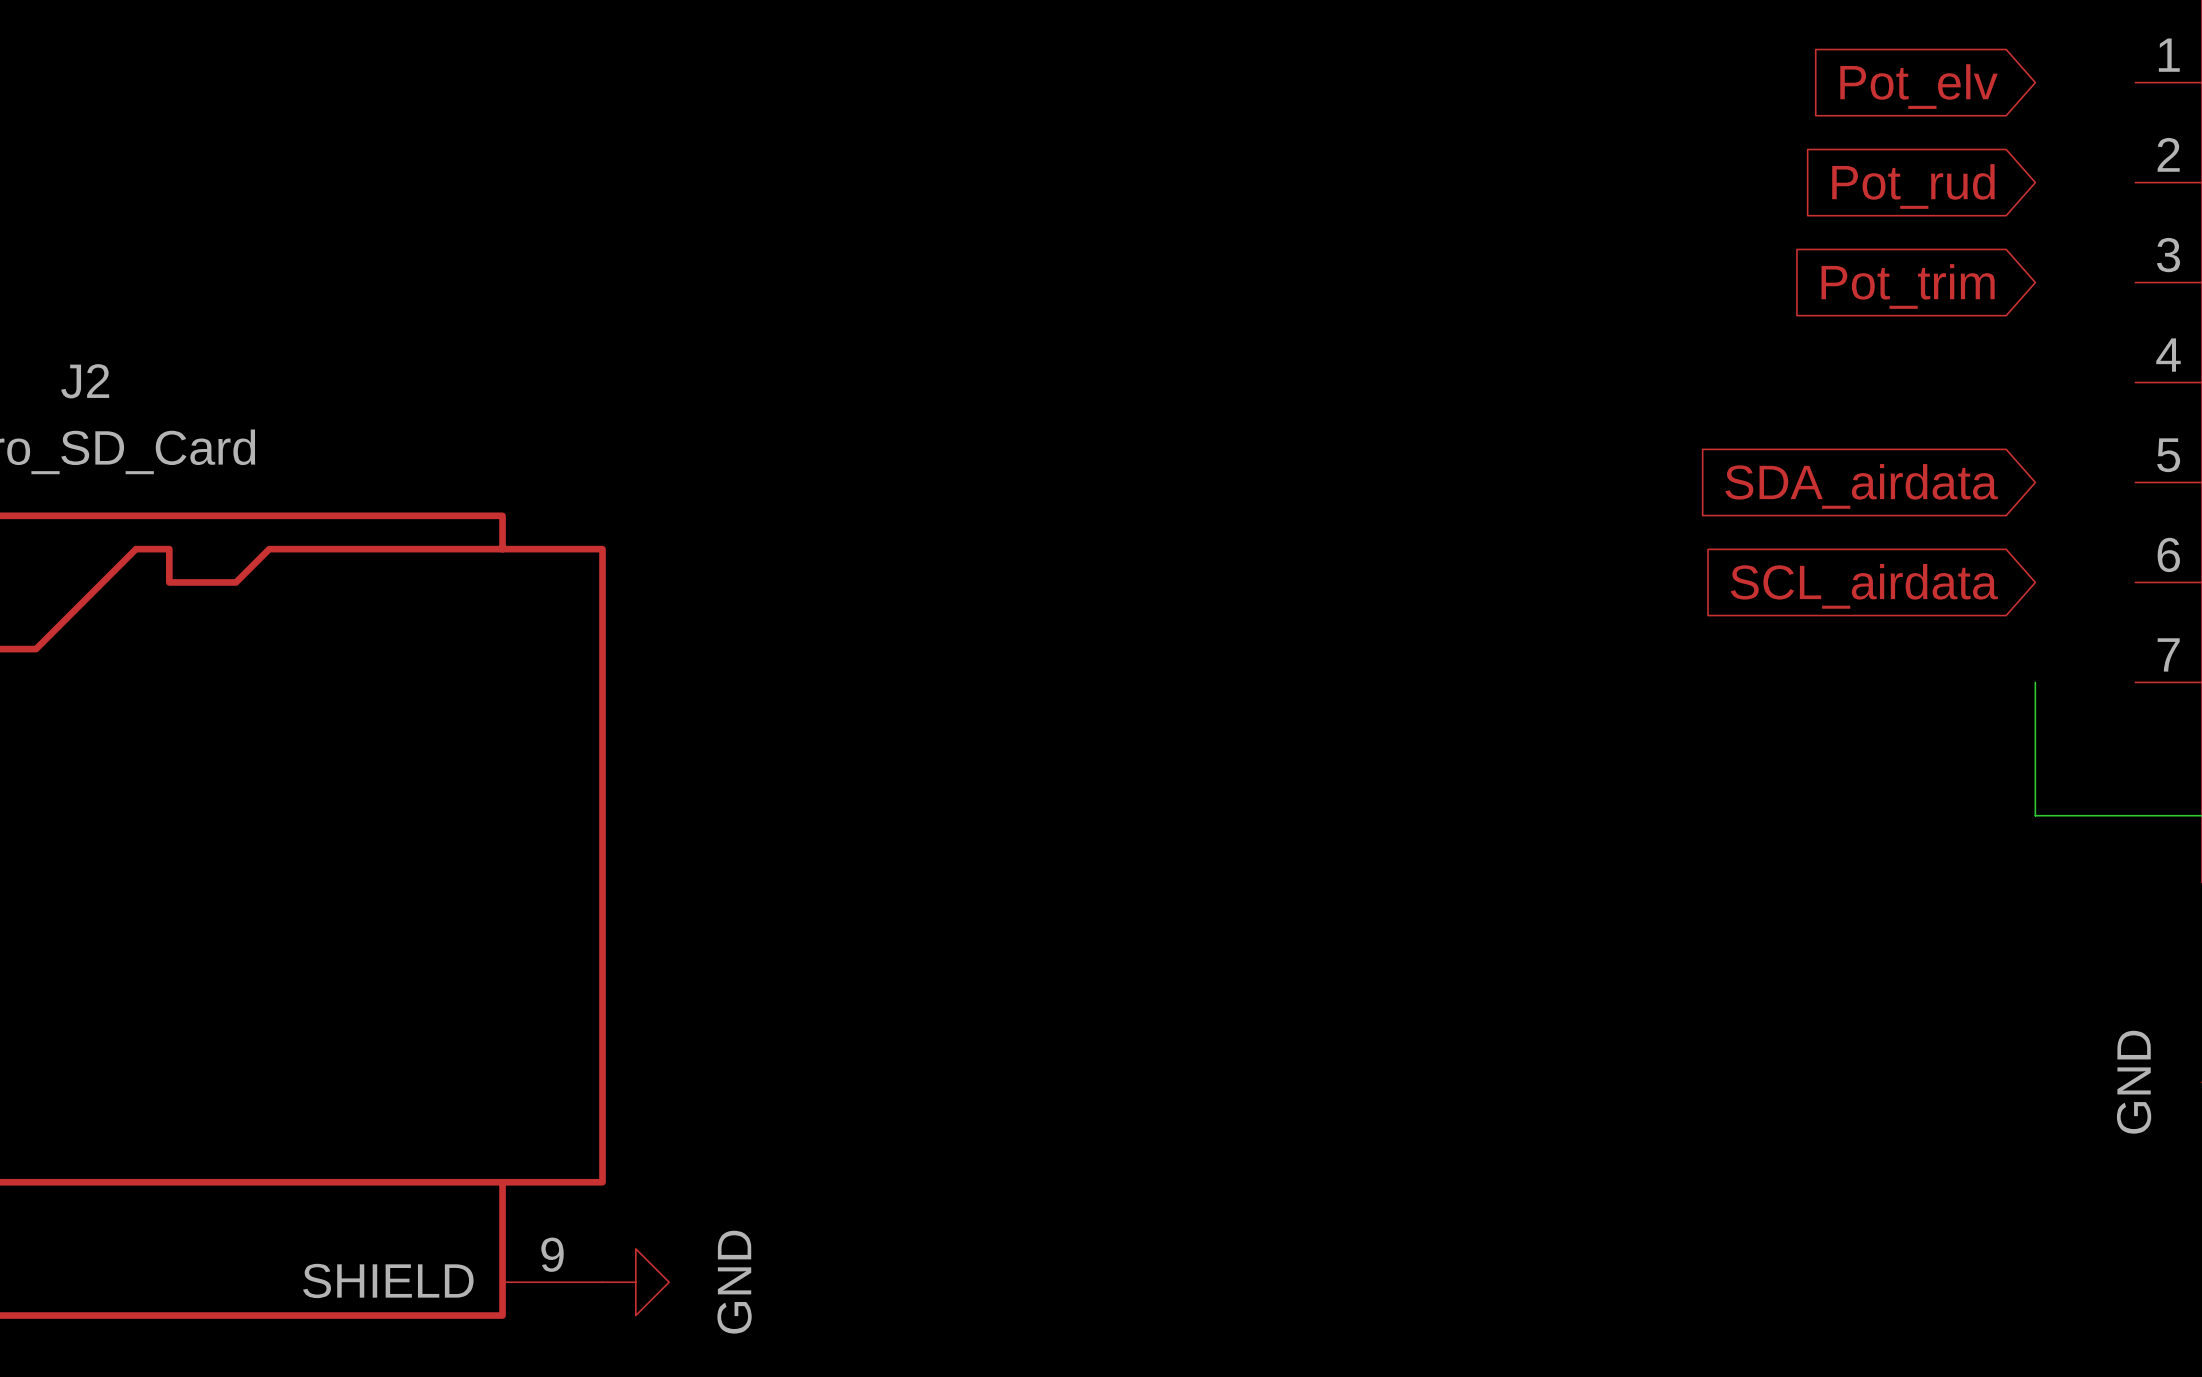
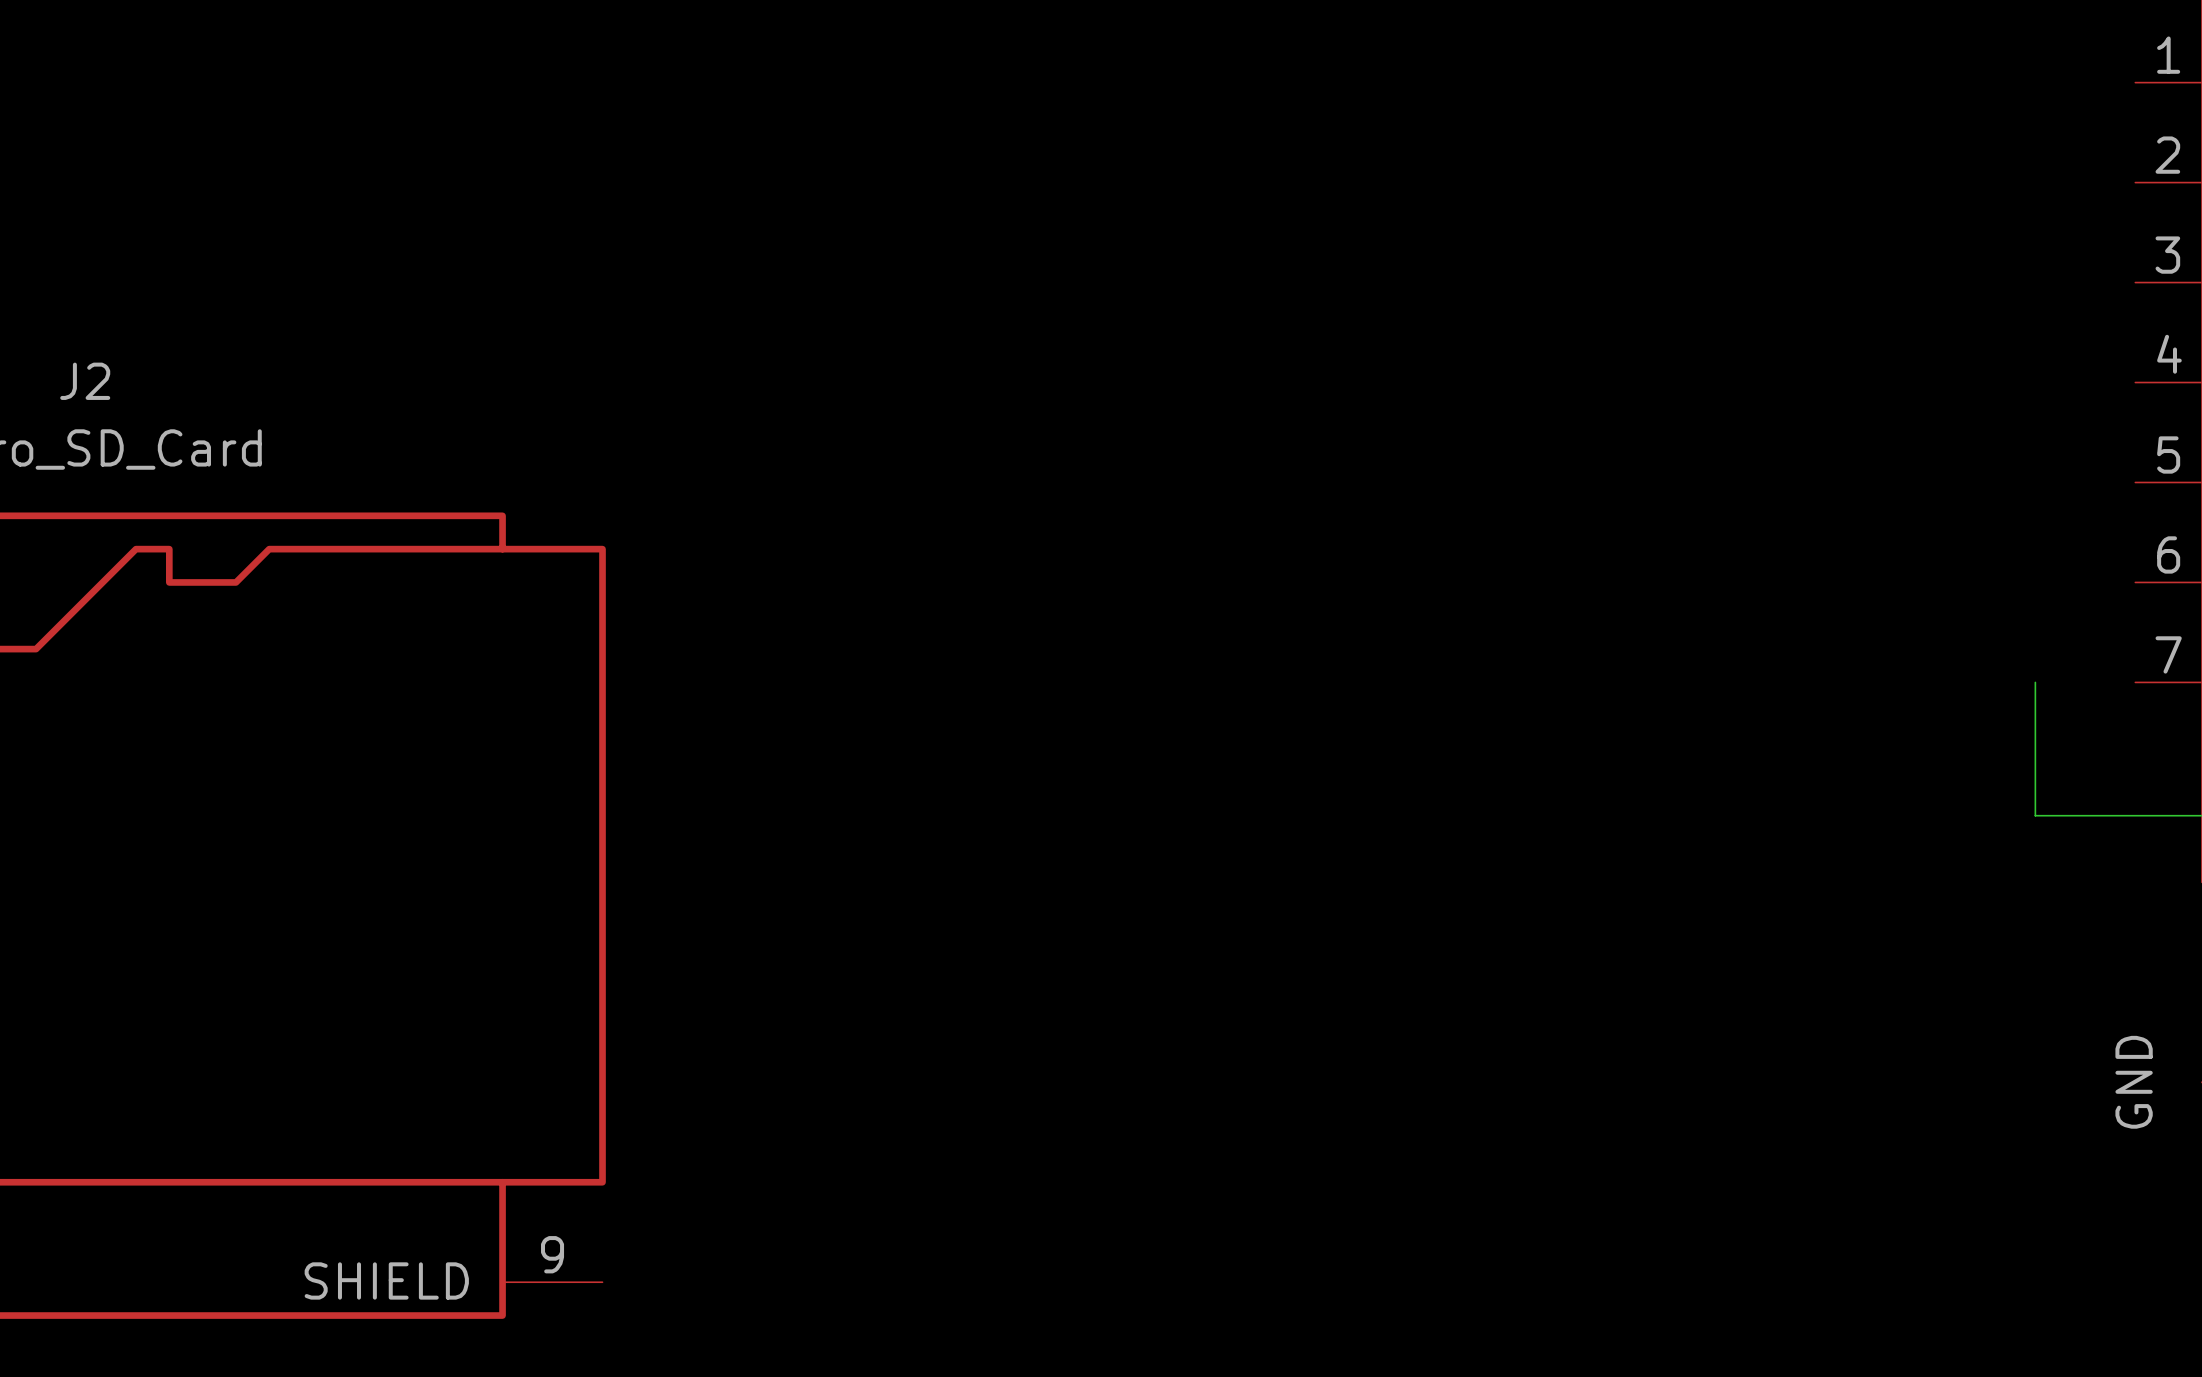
global label: Pot_elv (1919, 86) -> none
global label: Pot_rud (1913, 186) -> none
global label: Pot_trim (1908, 286) -> none
global label: SDA_airdata (1861, 486) -> none
global label: SCL_airdata (1864, 586) -> none
power symbol: GND (635, 1282) -> none

